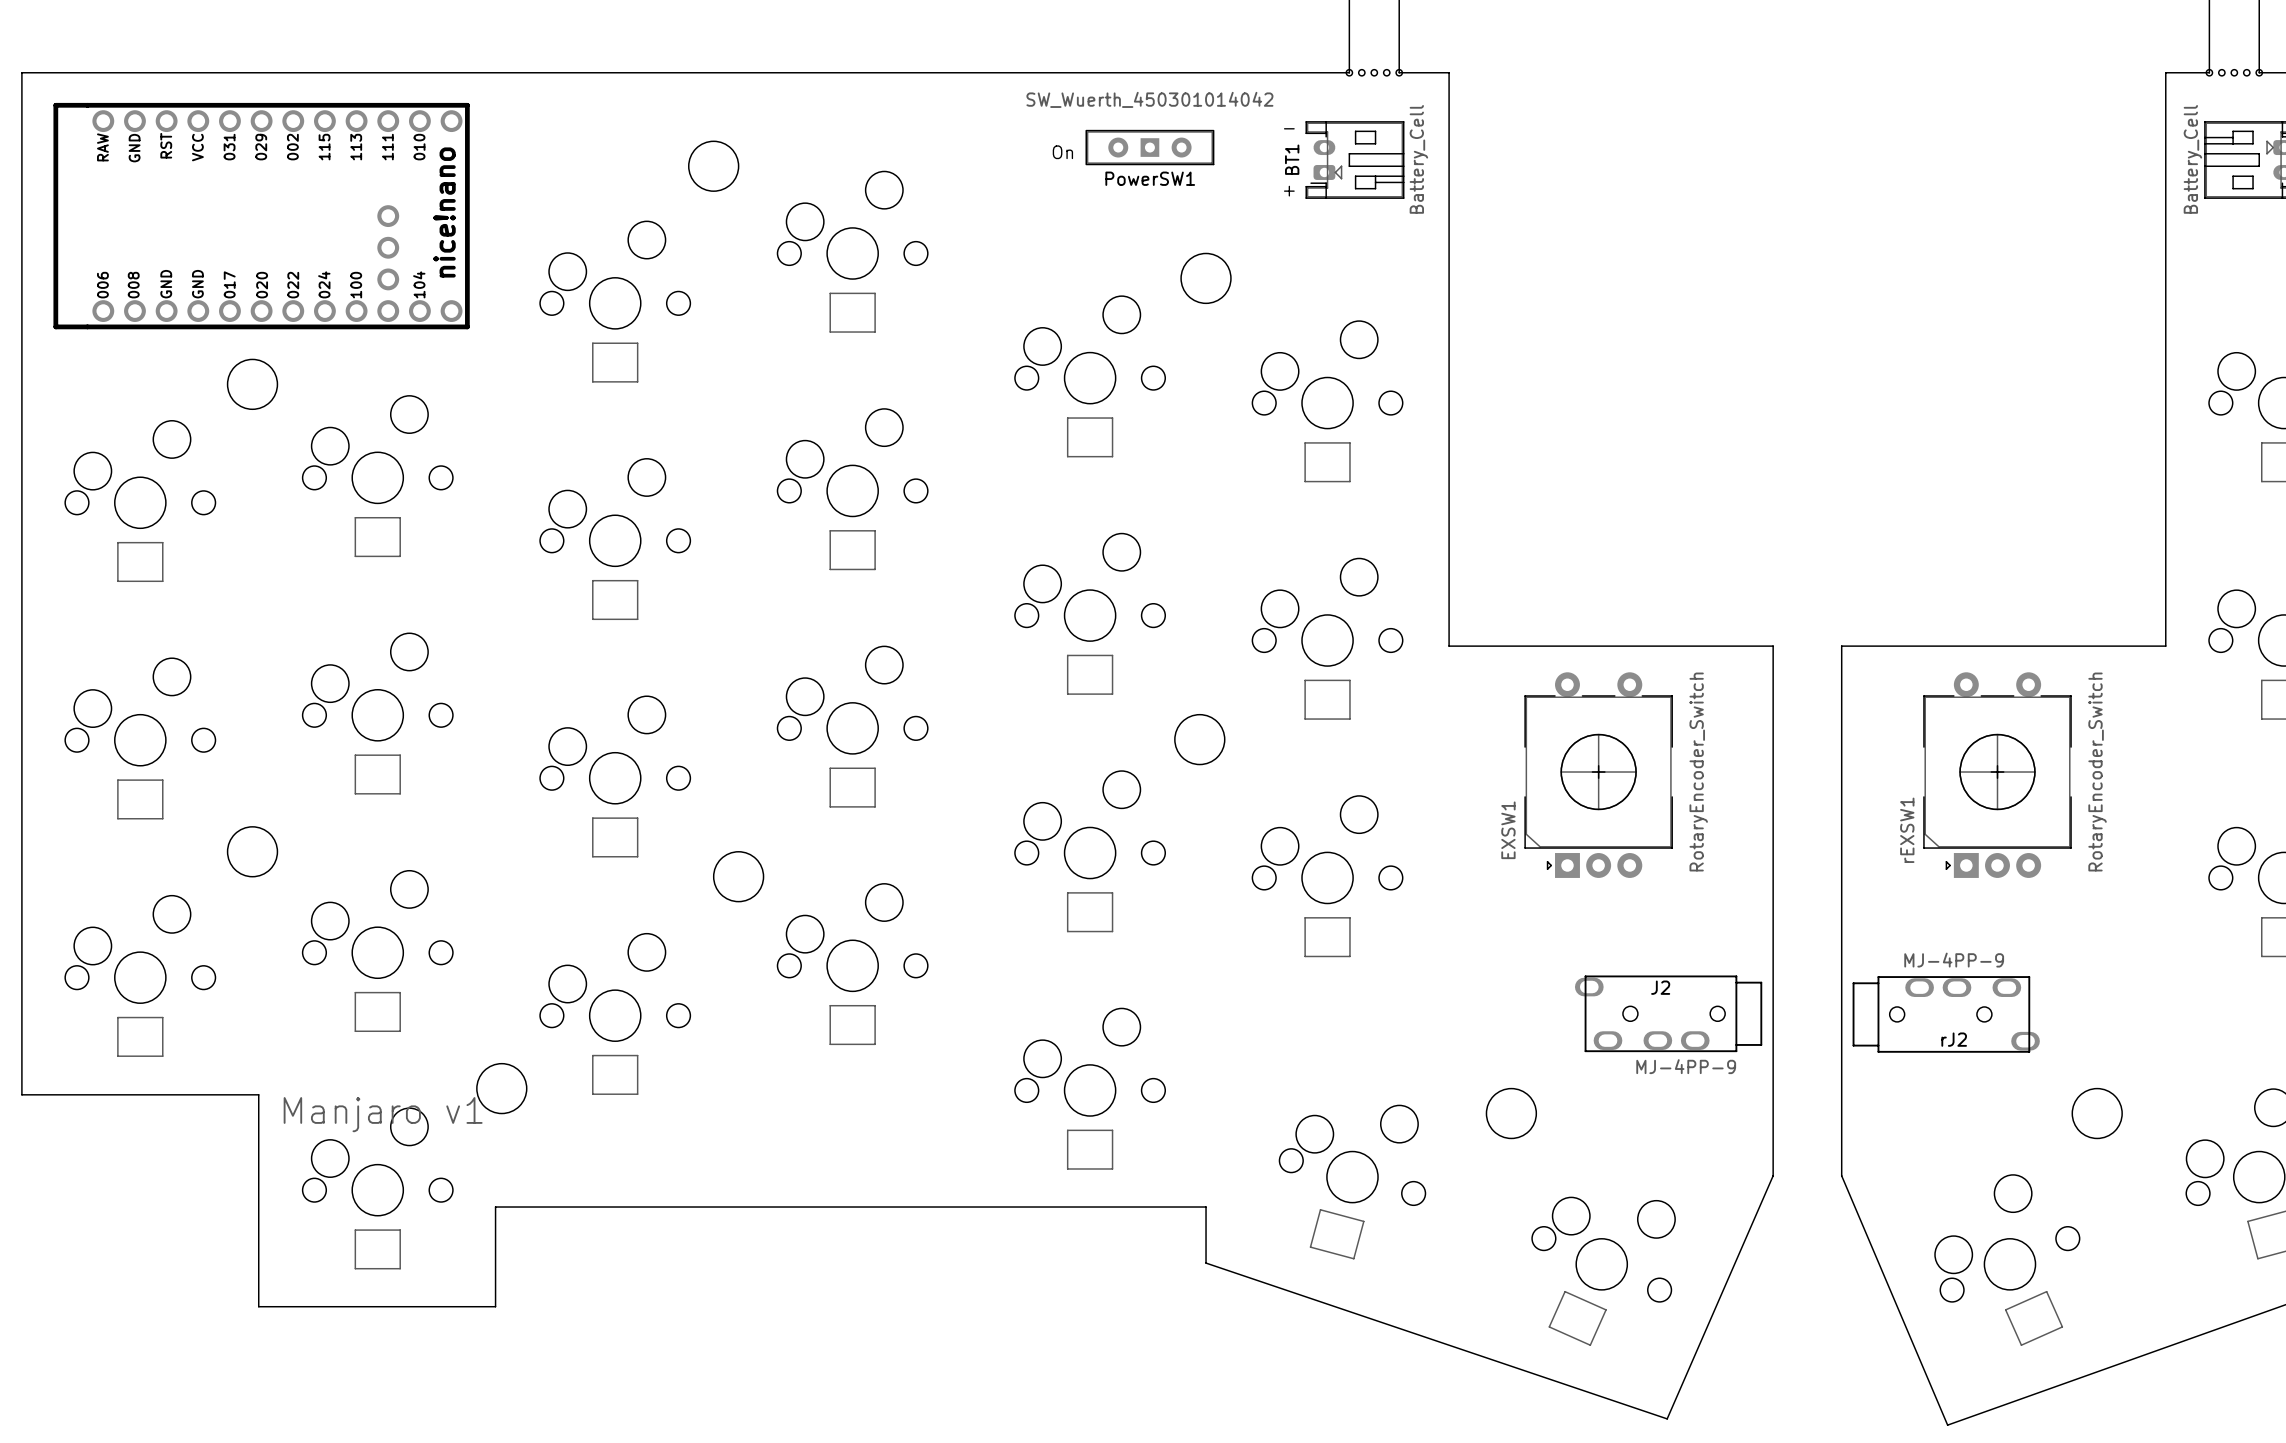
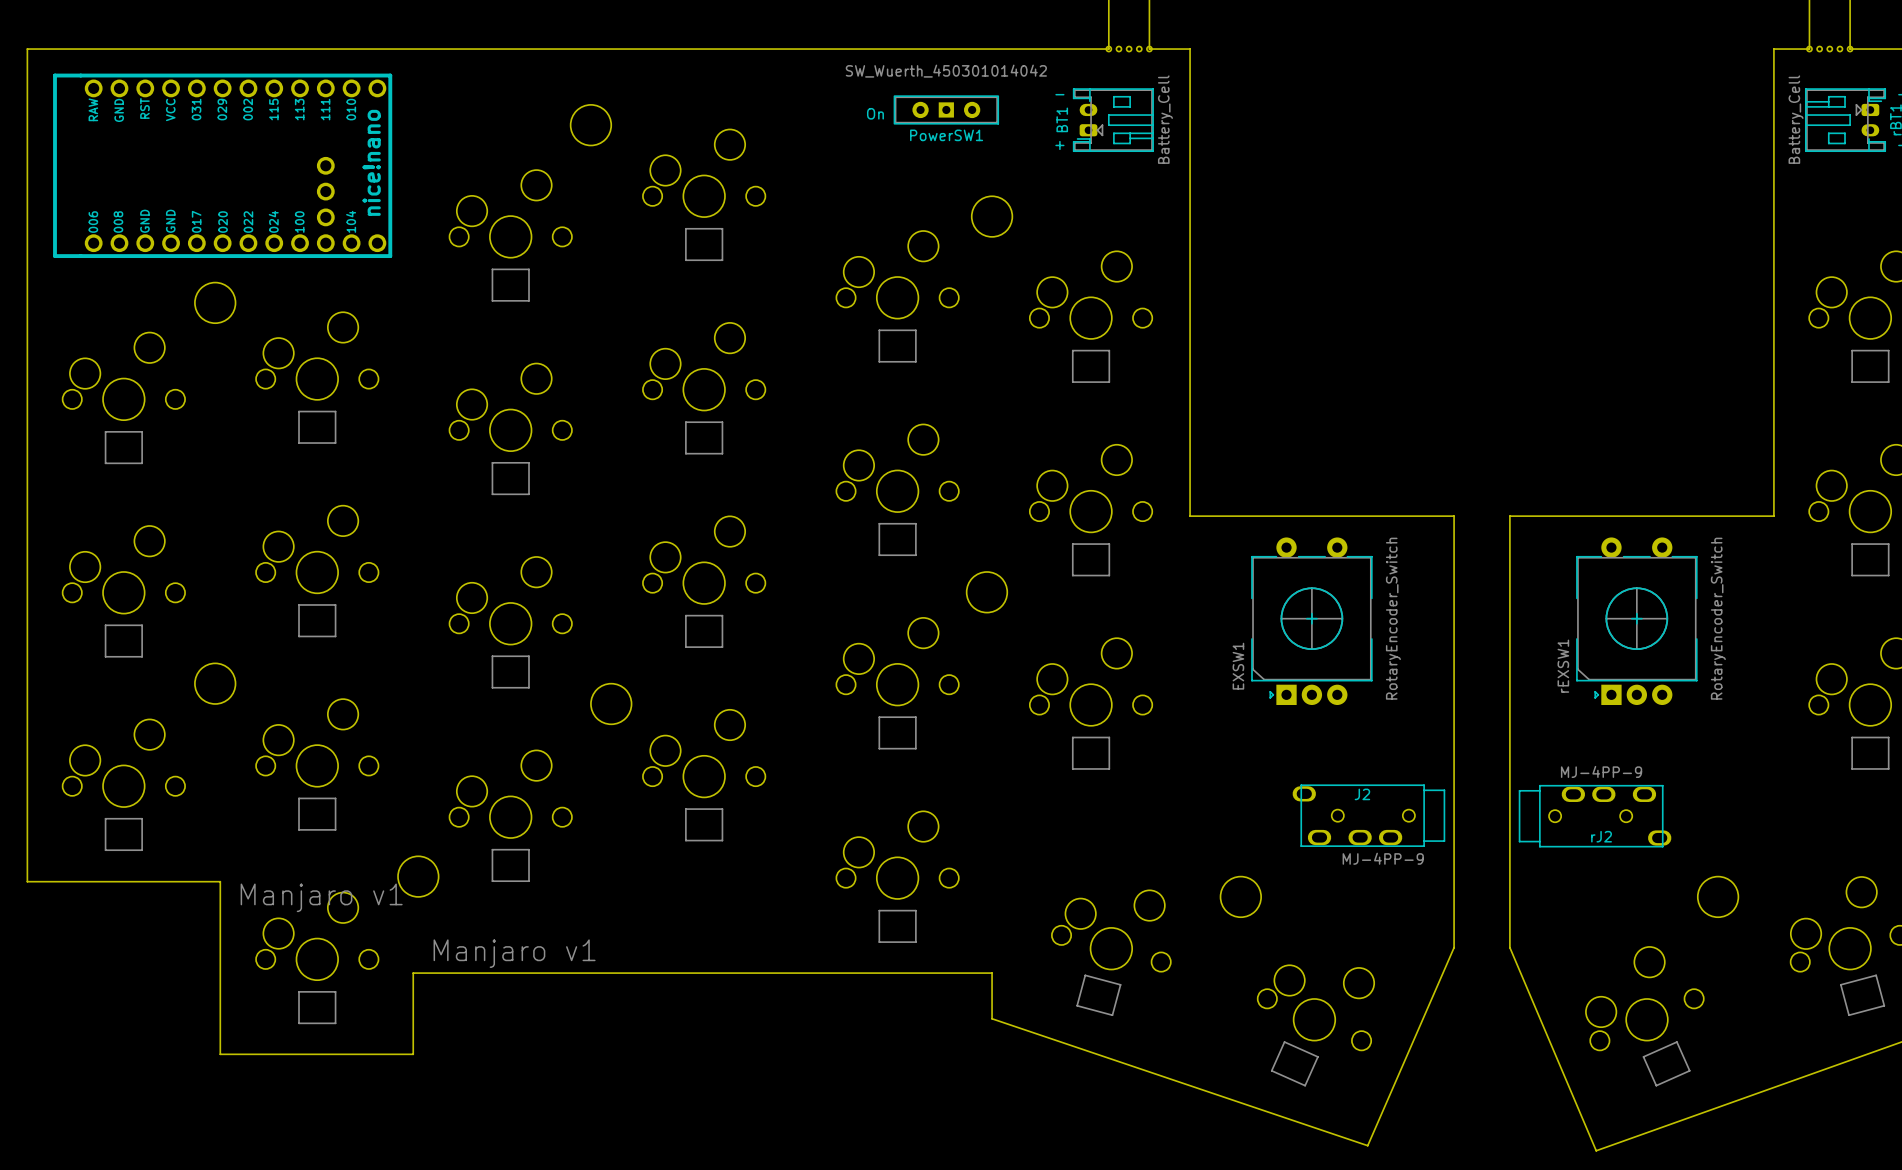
text: none -> Manjaro v1 (514, 953)

